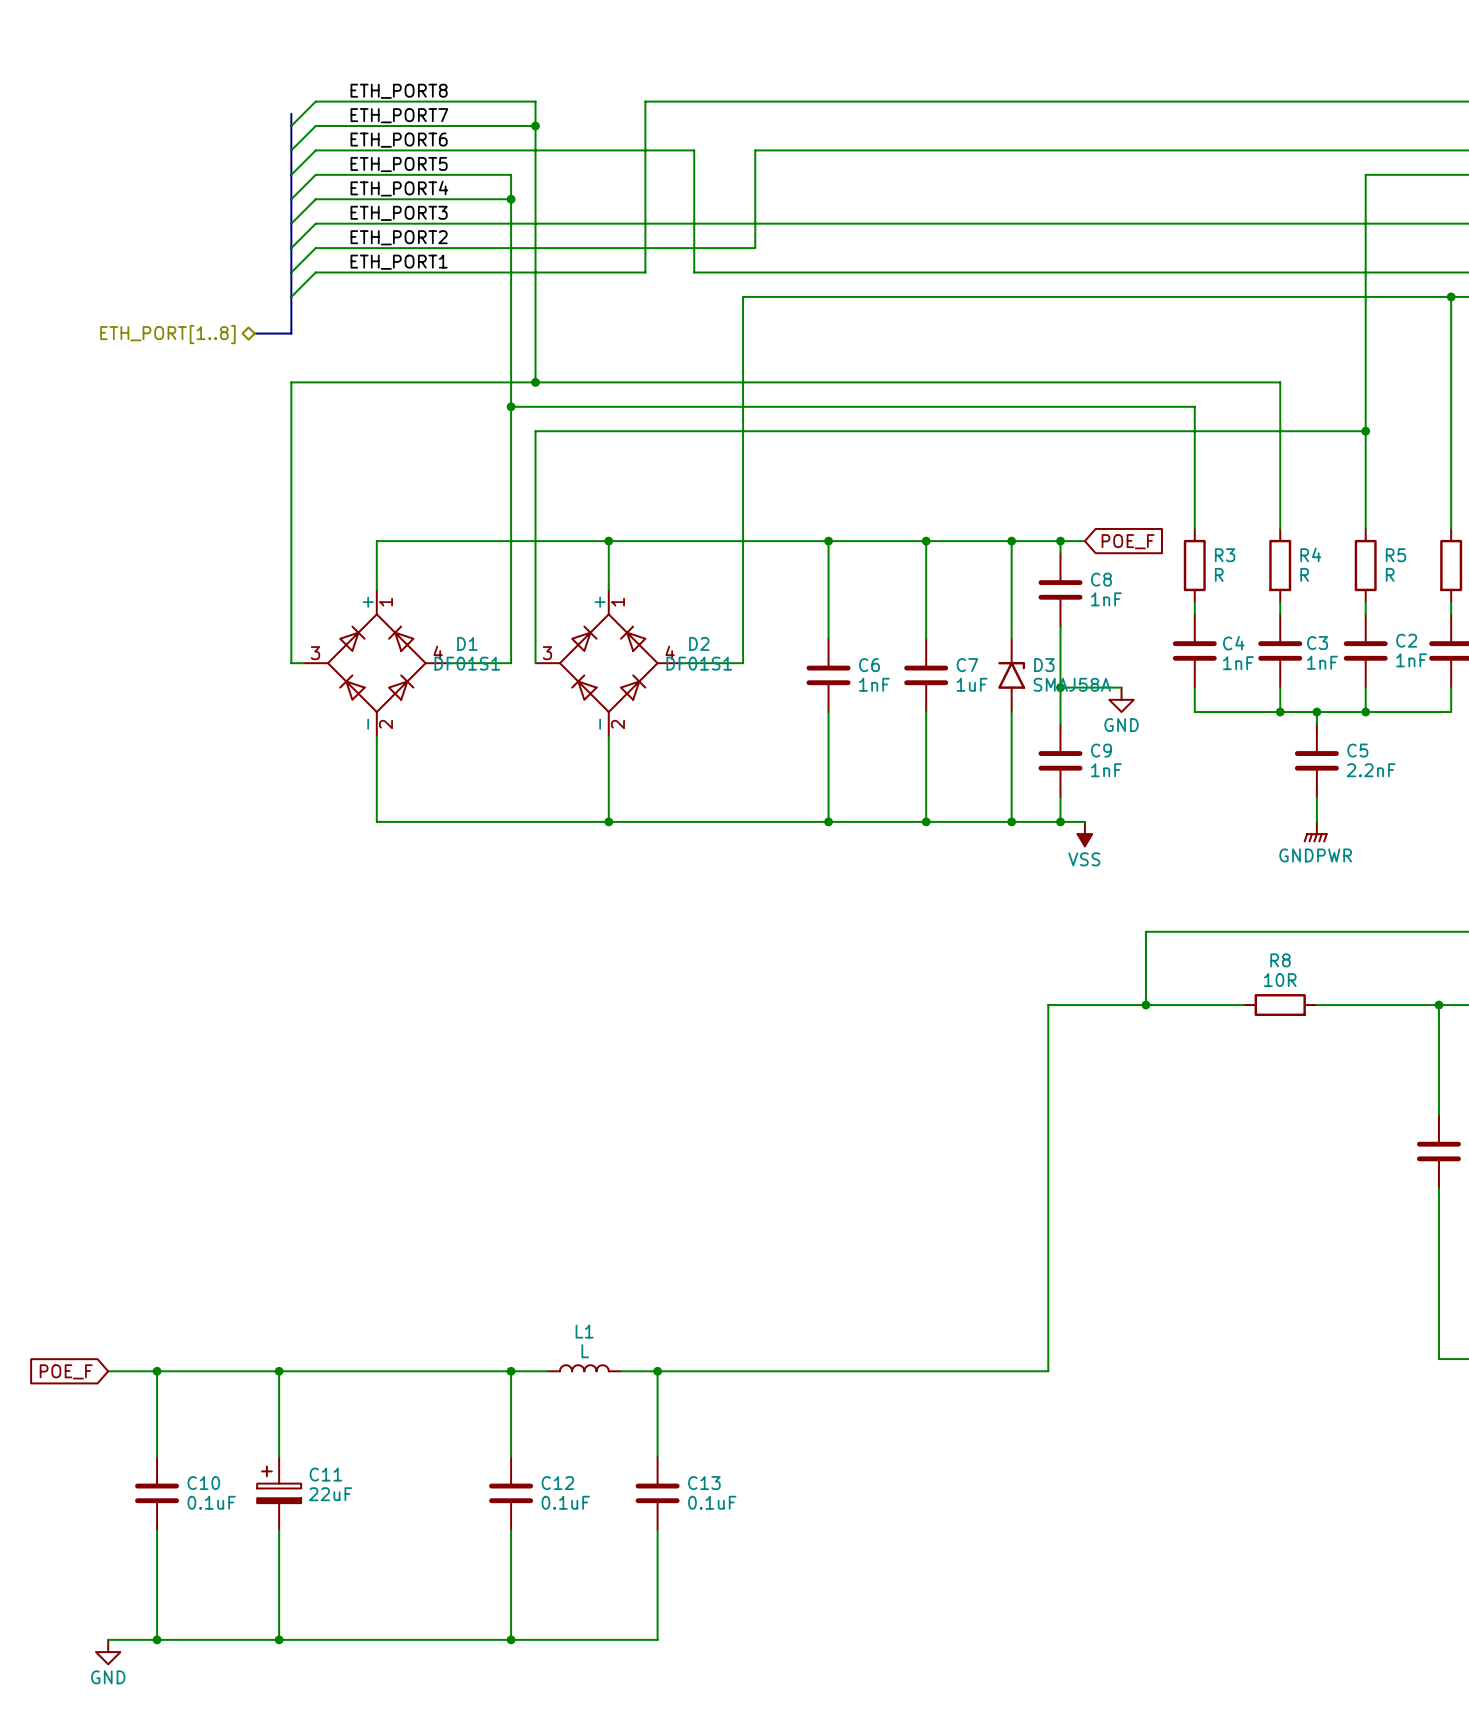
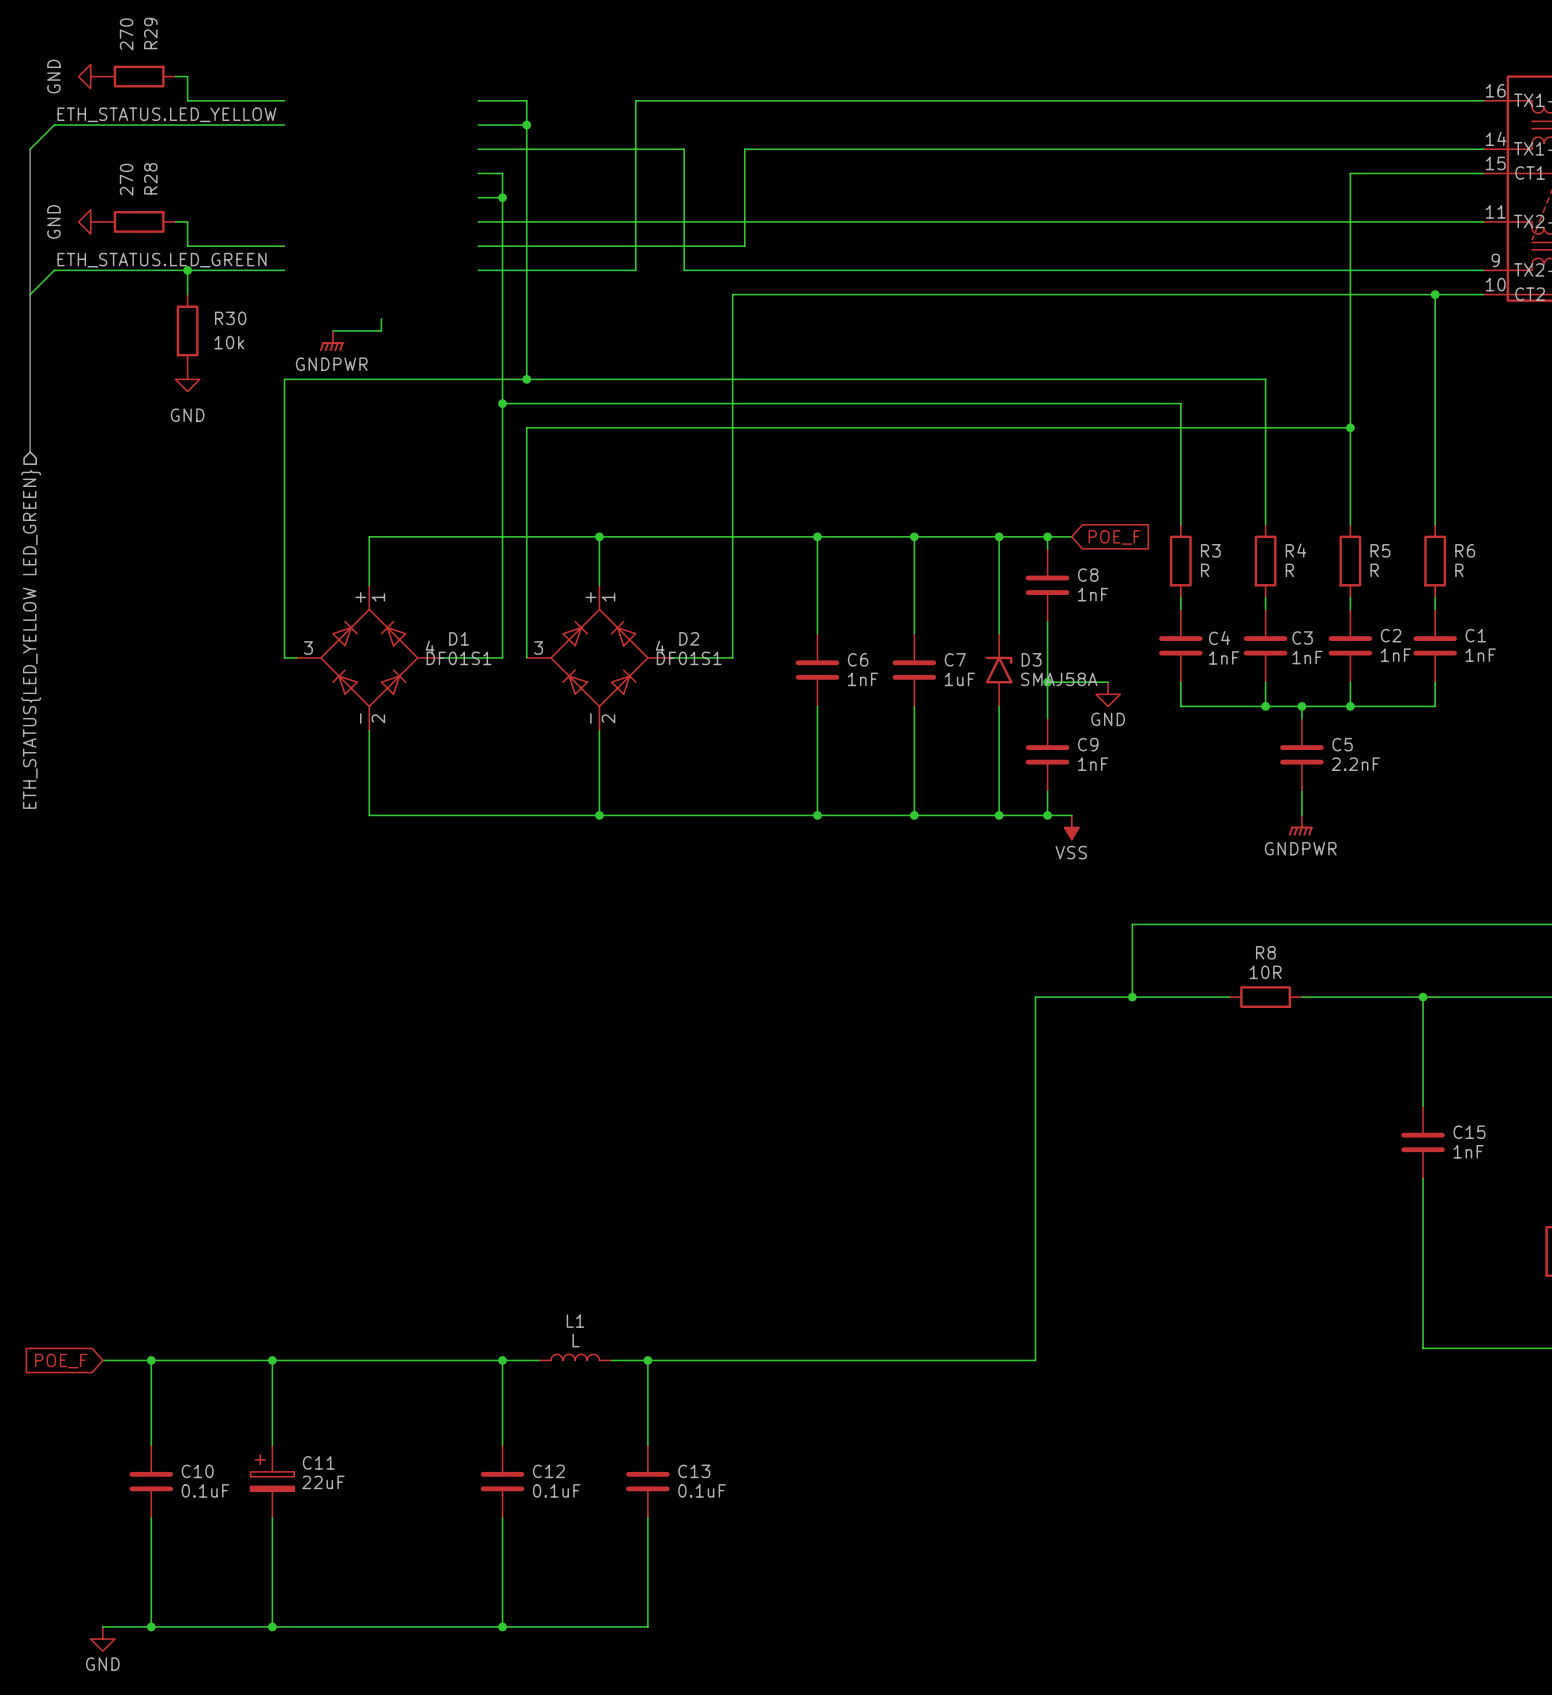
power symbol: none -> GND (90, 76)
R29: none -> 270 (139, 76)
wire: none -> (175, 76) (187, 76) (187, 100) (284, 100)
label: ETH_PORT8 (399, 91) -> none
wire: (486, 101) (315, 101) (291, 126) -> (30, 149) (54, 125) (284, 125)
bus: (291, 113) (291, 333) (254, 333) -> none
label: none -> ETH_STATUS.LED_YELLOW (166, 114)
label: ETH_PORT7 (399, 115) -> none
wire: (486, 126) (315, 126) (291, 150) -> none
label: ETH_PORT6 (399, 140) -> none
bus: none -> (30, 149) (30, 452)
wire: (486, 150) (315, 150) (291, 174) -> none
label: ETH_PORT5 (399, 164) -> none
wire: (486, 174) (315, 174) (291, 199) -> none
label: ETH_PORT4 (399, 188) -> none
wire: (486, 199) (315, 199) (291, 223) -> none
label: ETH_PORT3 (399, 213) -> none
power symbol: none -> GND (90, 221)
R28: none -> 270 (139, 221)
wire: (486, 223) (315, 223) (291, 248) -> (175, 221) (187, 221) (187, 246) (284, 246)
label: ETH_PORT2 (399, 237) -> none
wire: (486, 248) (315, 248) (291, 272) -> (30, 294) (54, 270) (284, 270)
label: none -> ETH_STATUS.LED_GREEN (162, 260)
label: ETH_PORT1 (399, 262) -> none
wire: none -> (187, 270) (187, 294)
junction: none -> (187, 270)
wire: (486, 272) (315, 272) (291, 296) -> none
wire: none -> (381, 318) (381, 330) (332, 330)
R30: none -> 10k (187, 330)
hierarchical label: ETH_PORT[1..8] (167, 334) -> none
power symbol: none -> GNDPWR (331, 341)
power symbol: none -> GND (187, 379)
hierarchical label: none -> ETH_STATUS{LED_YELLOW LED_GREEN} (31, 639)

